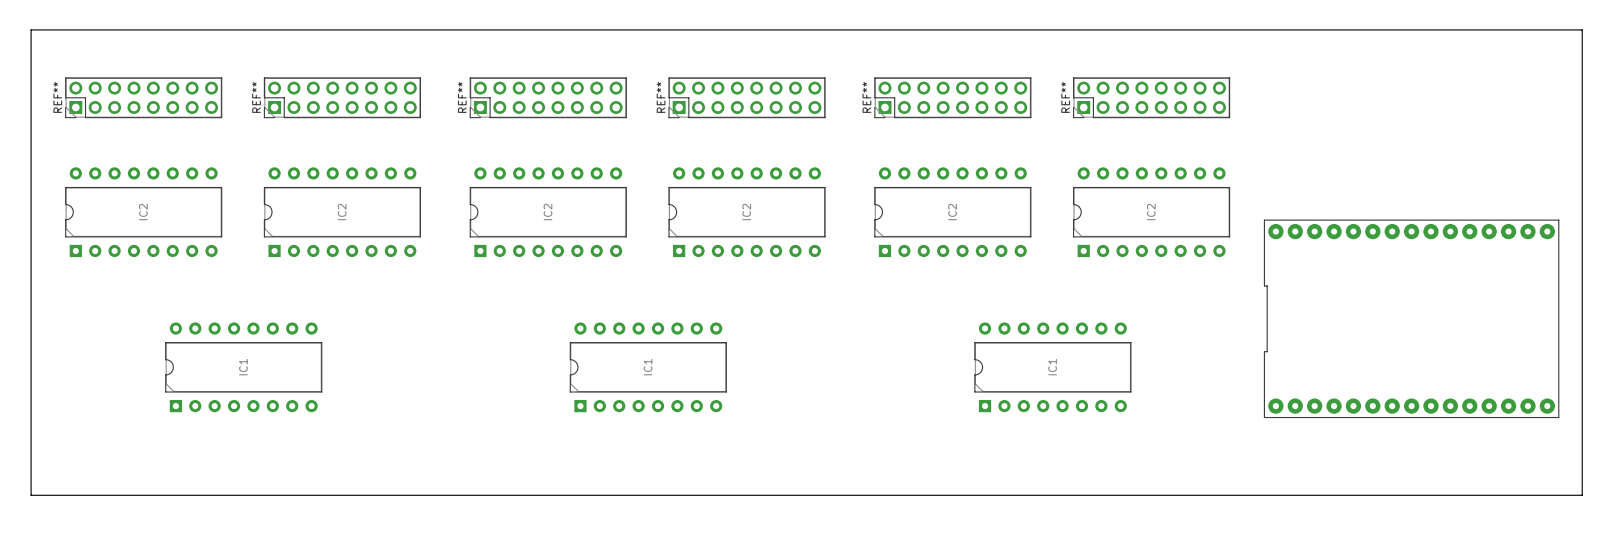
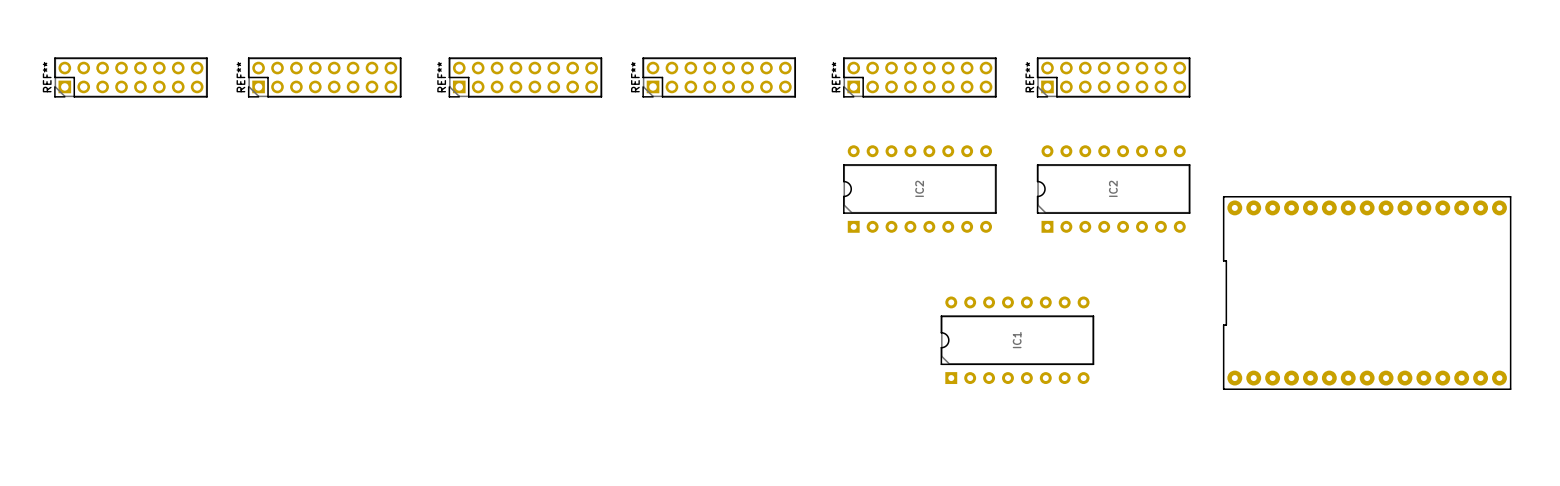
board edge: (31, 29) (1582, 29) (1582, 495) (31, 495) (31, 29) -> none
part: (143, 212) -> none
part: (342, 212) -> none
part: (548, 212) -> none
part: (747, 212) -> none
part: (243, 367) -> none
part: (648, 367) -> none

